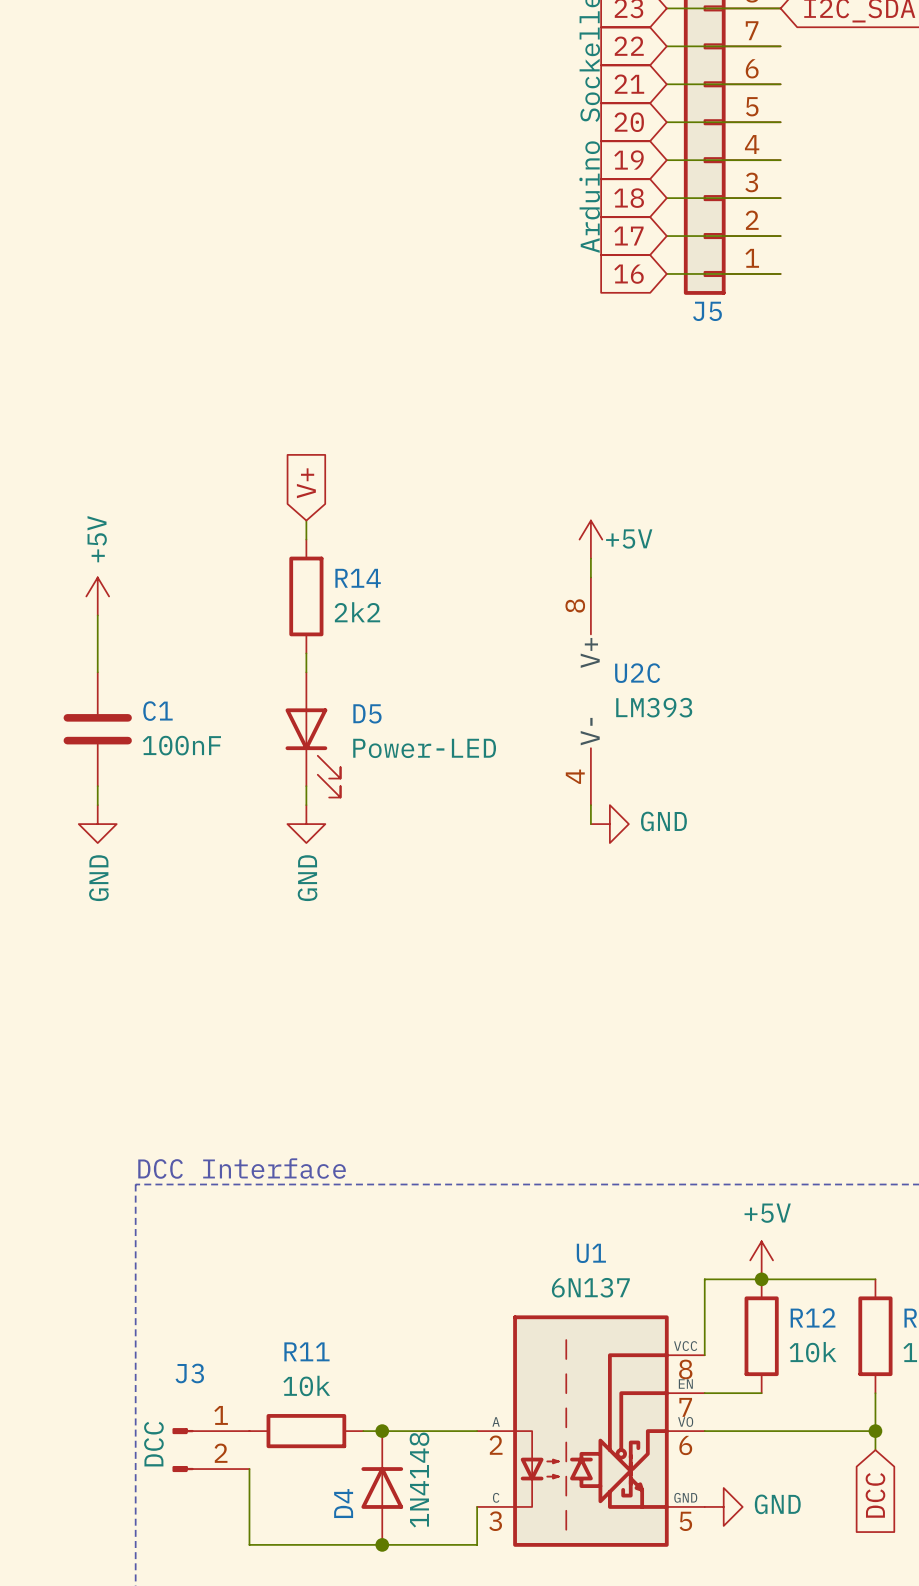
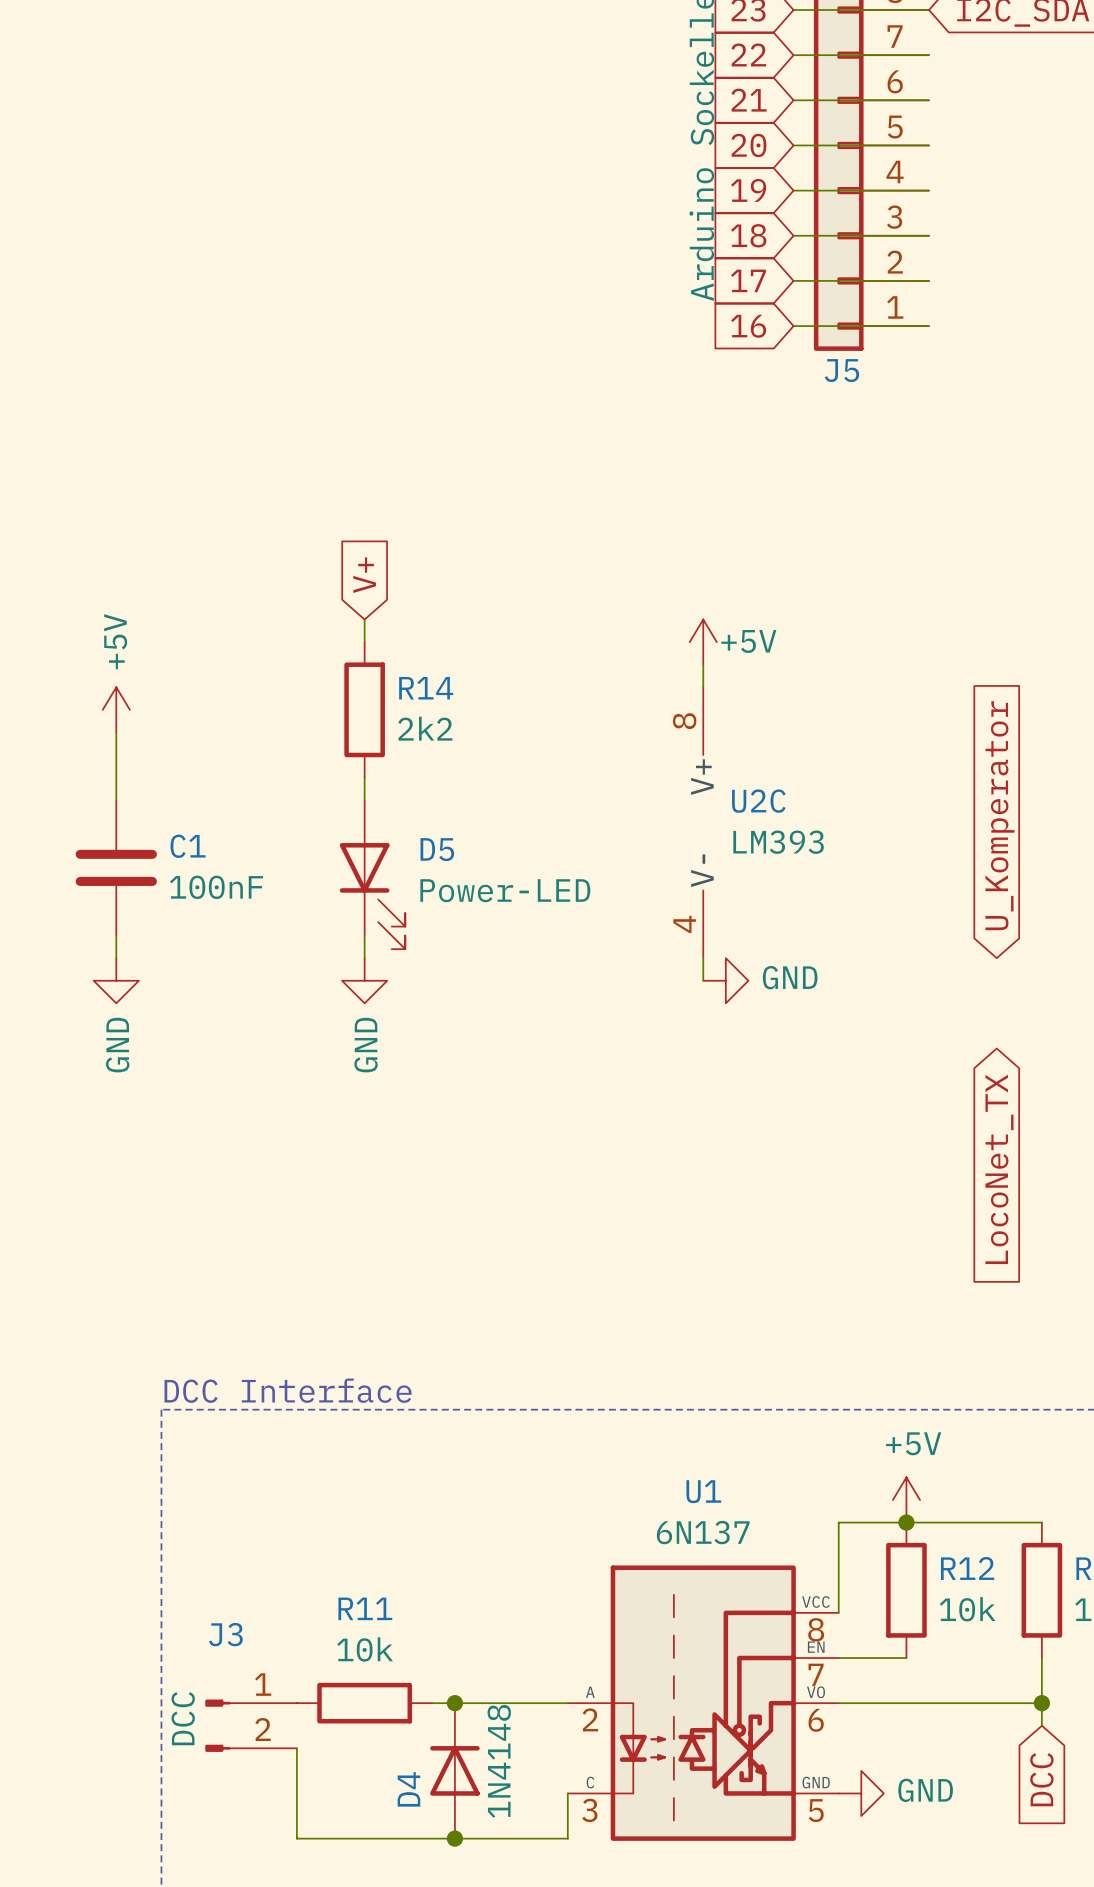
global label: none -> U_Komperator (999, 815)
global label: none -> LocoNet_TX (999, 1169)

